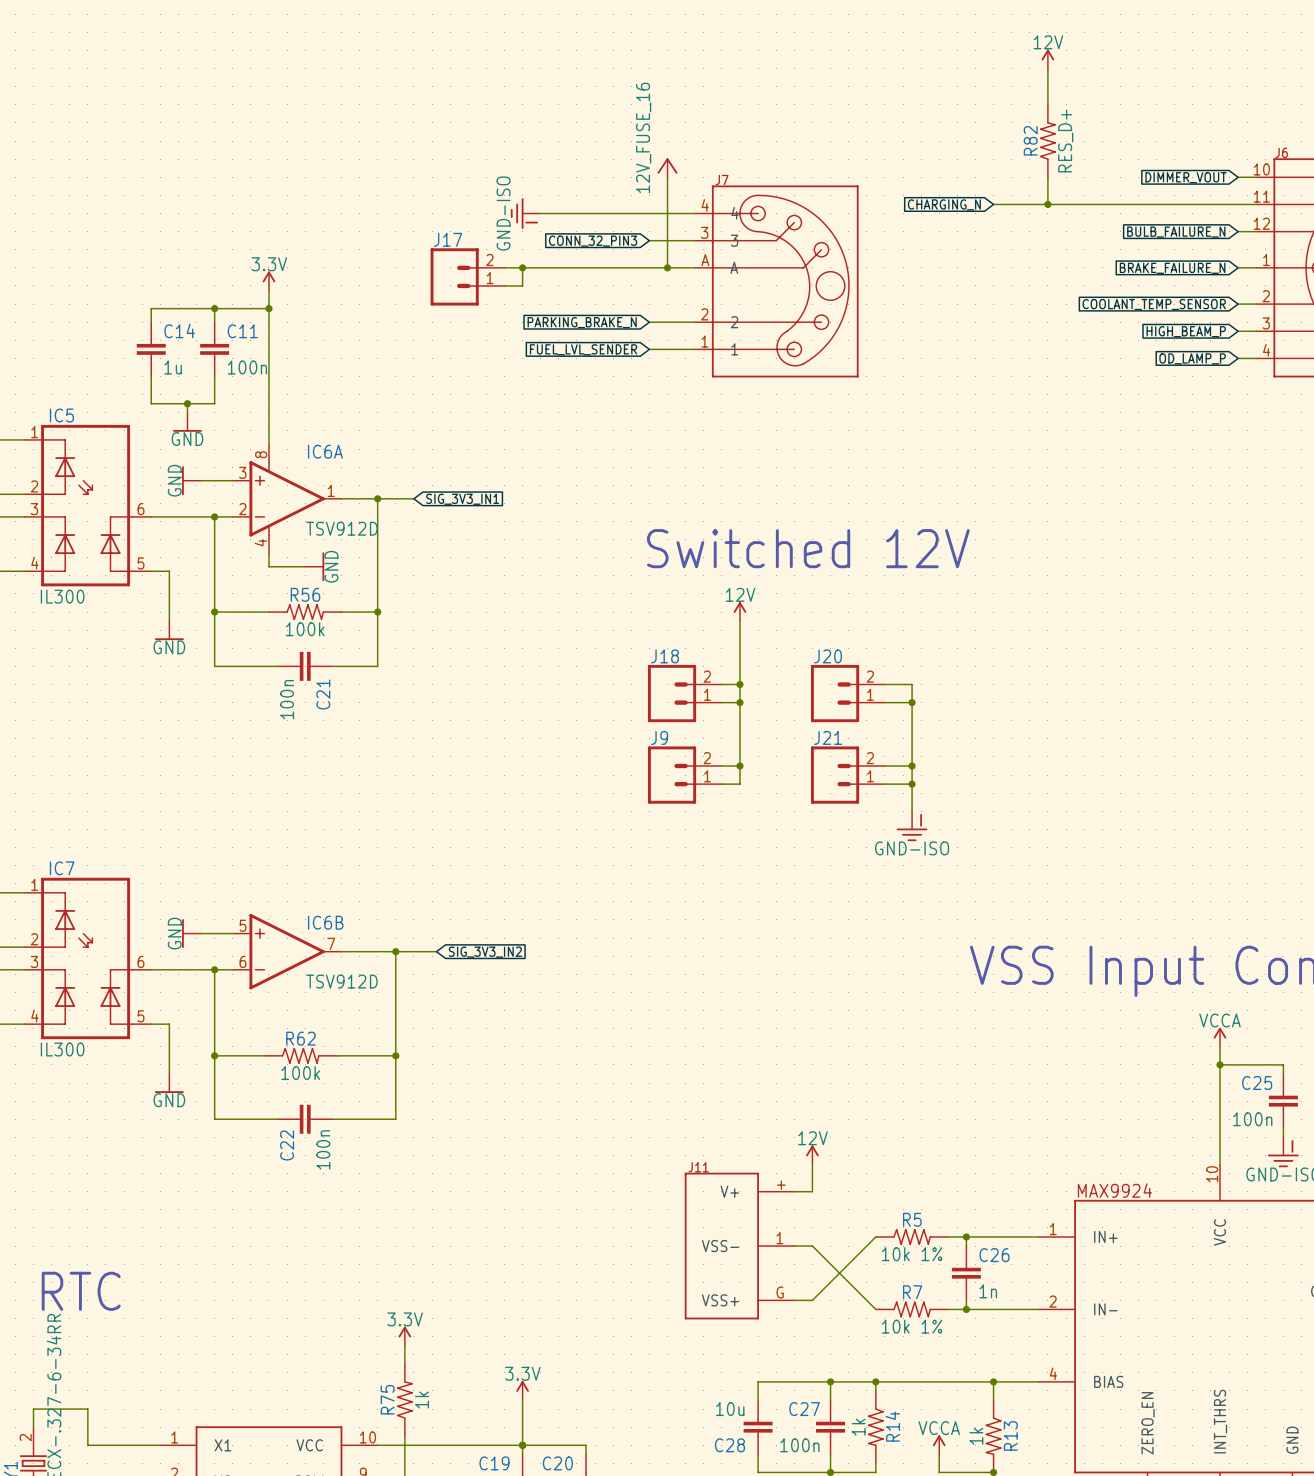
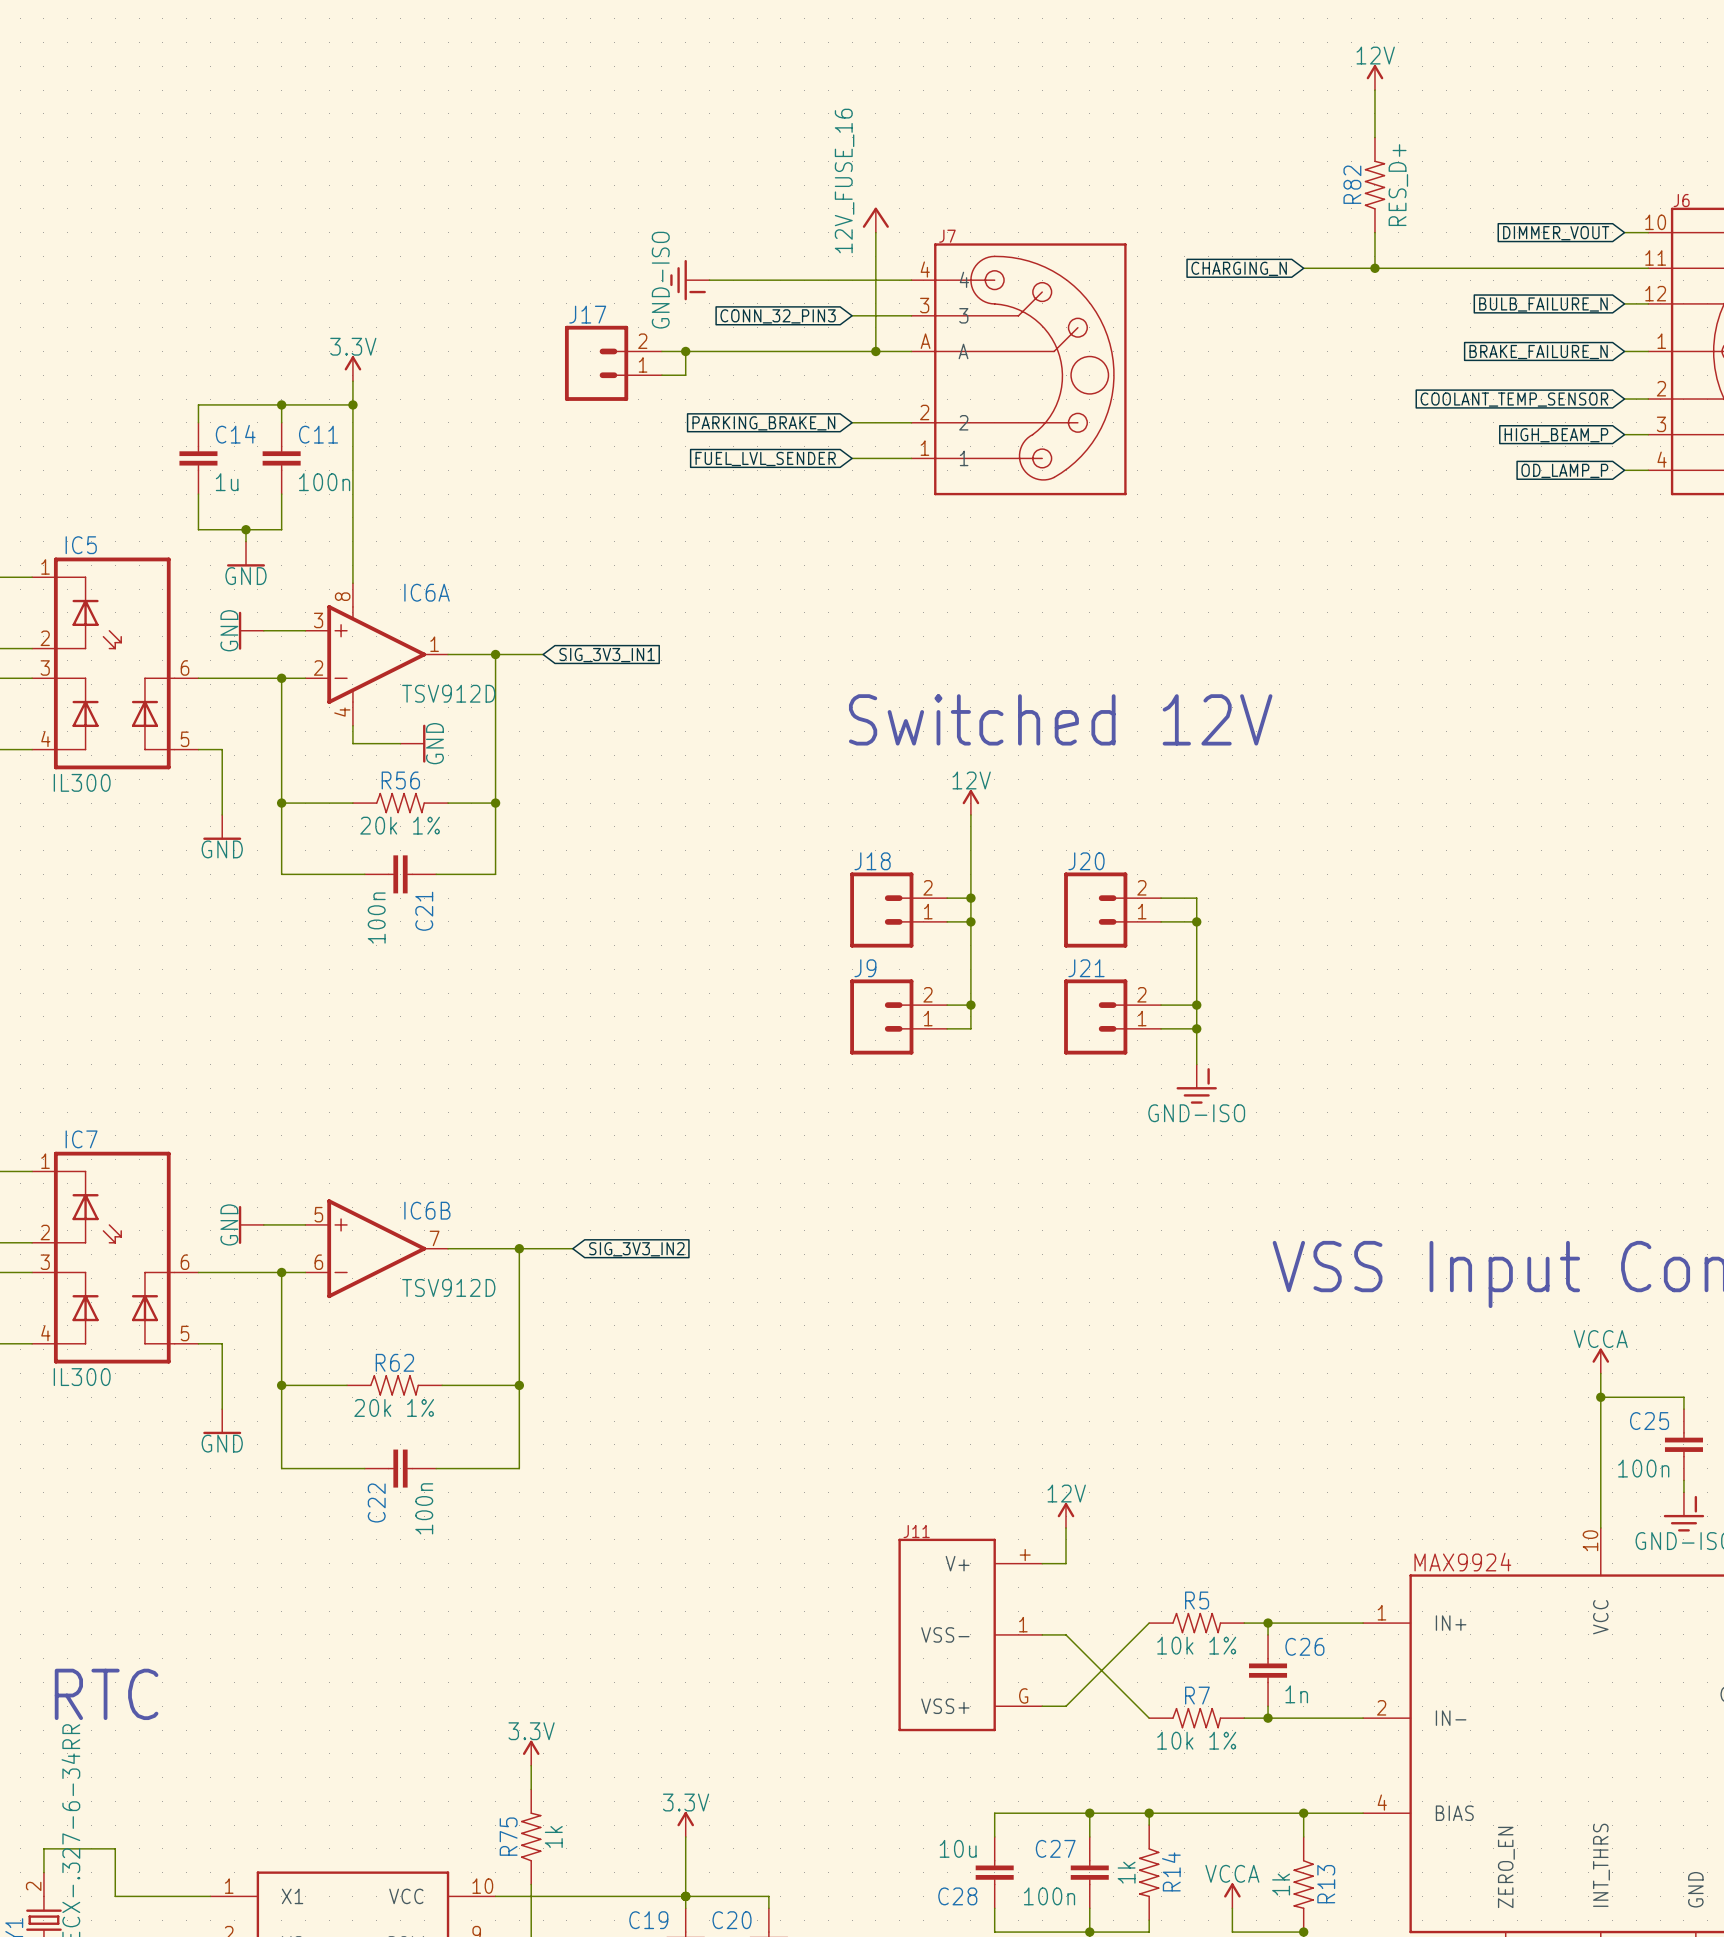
R56 value: 100k (305, 629) -> 20k 1% (400, 825)
R62 value: 100k (300, 1073) -> 20k 1% (394, 1407)

